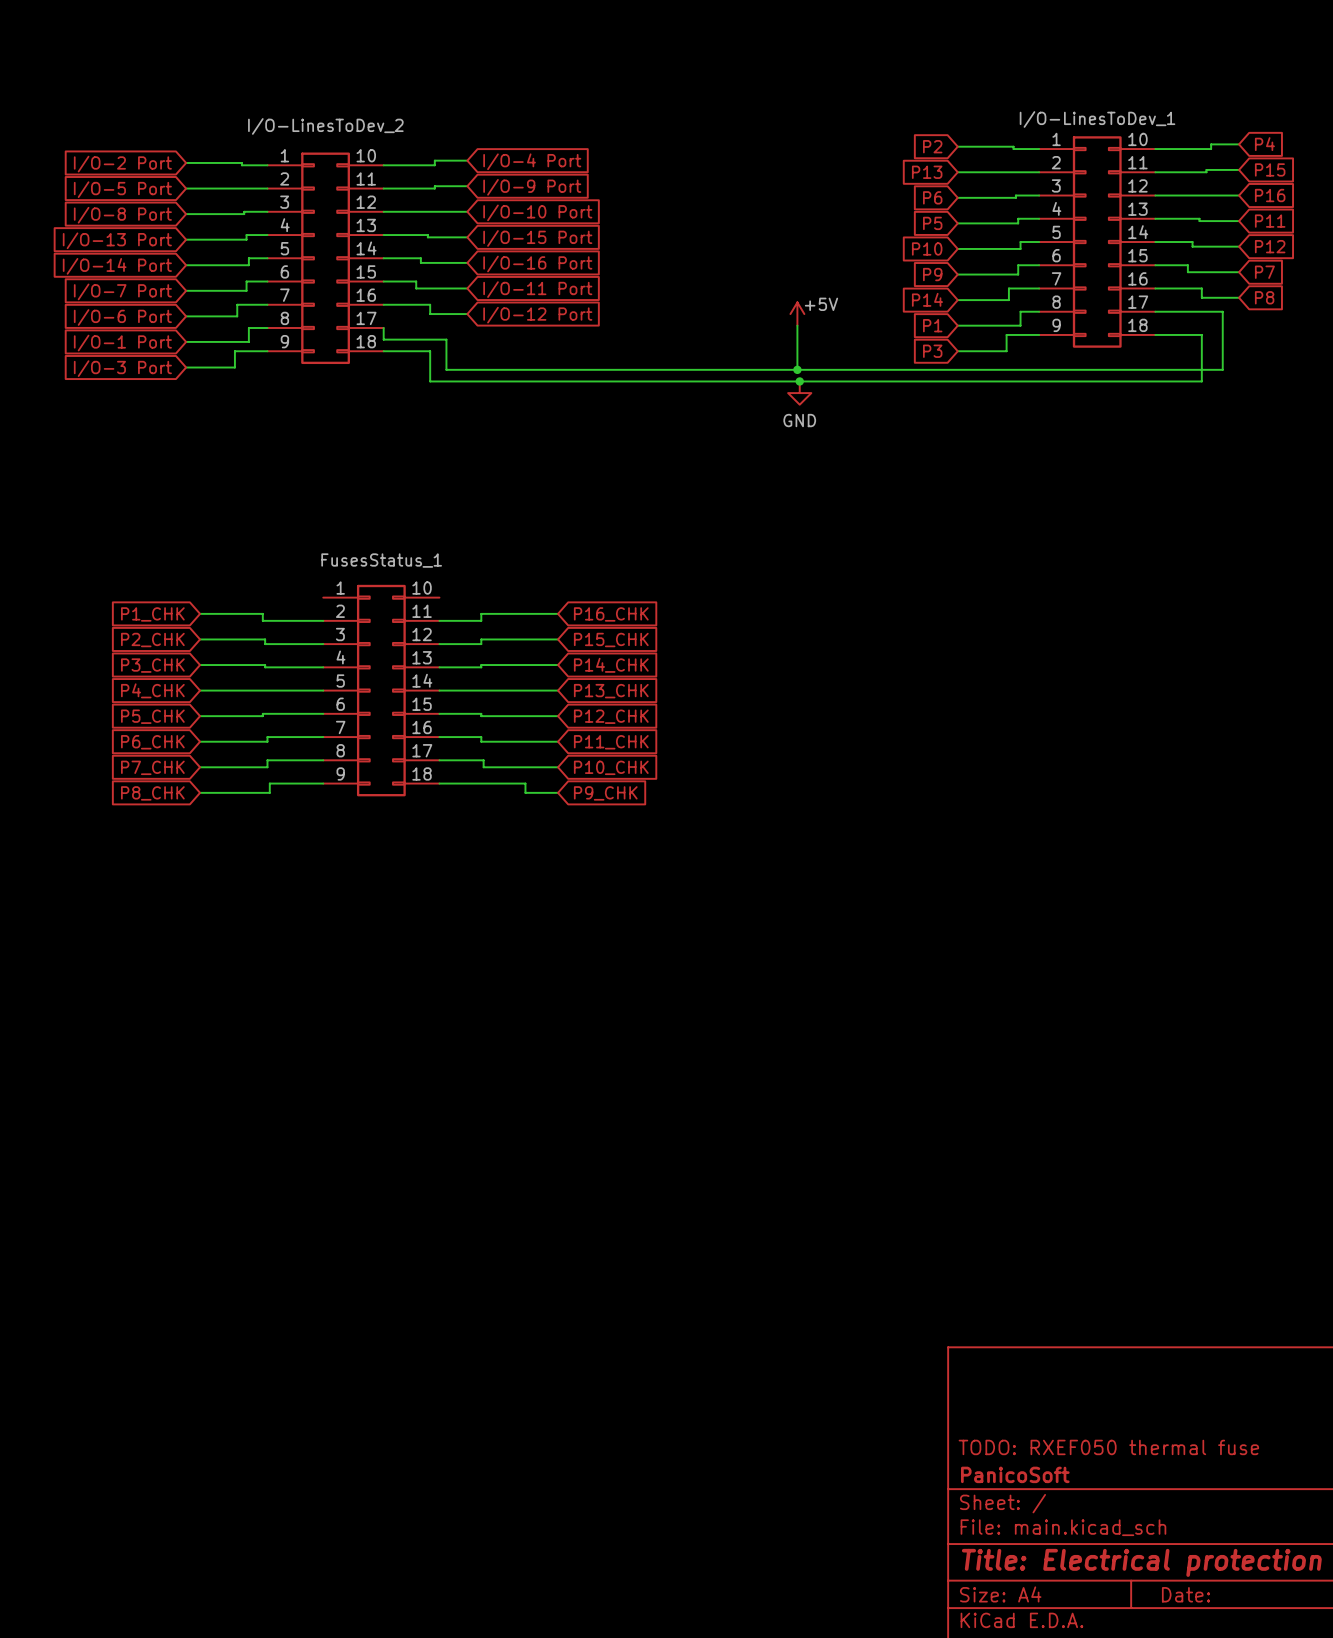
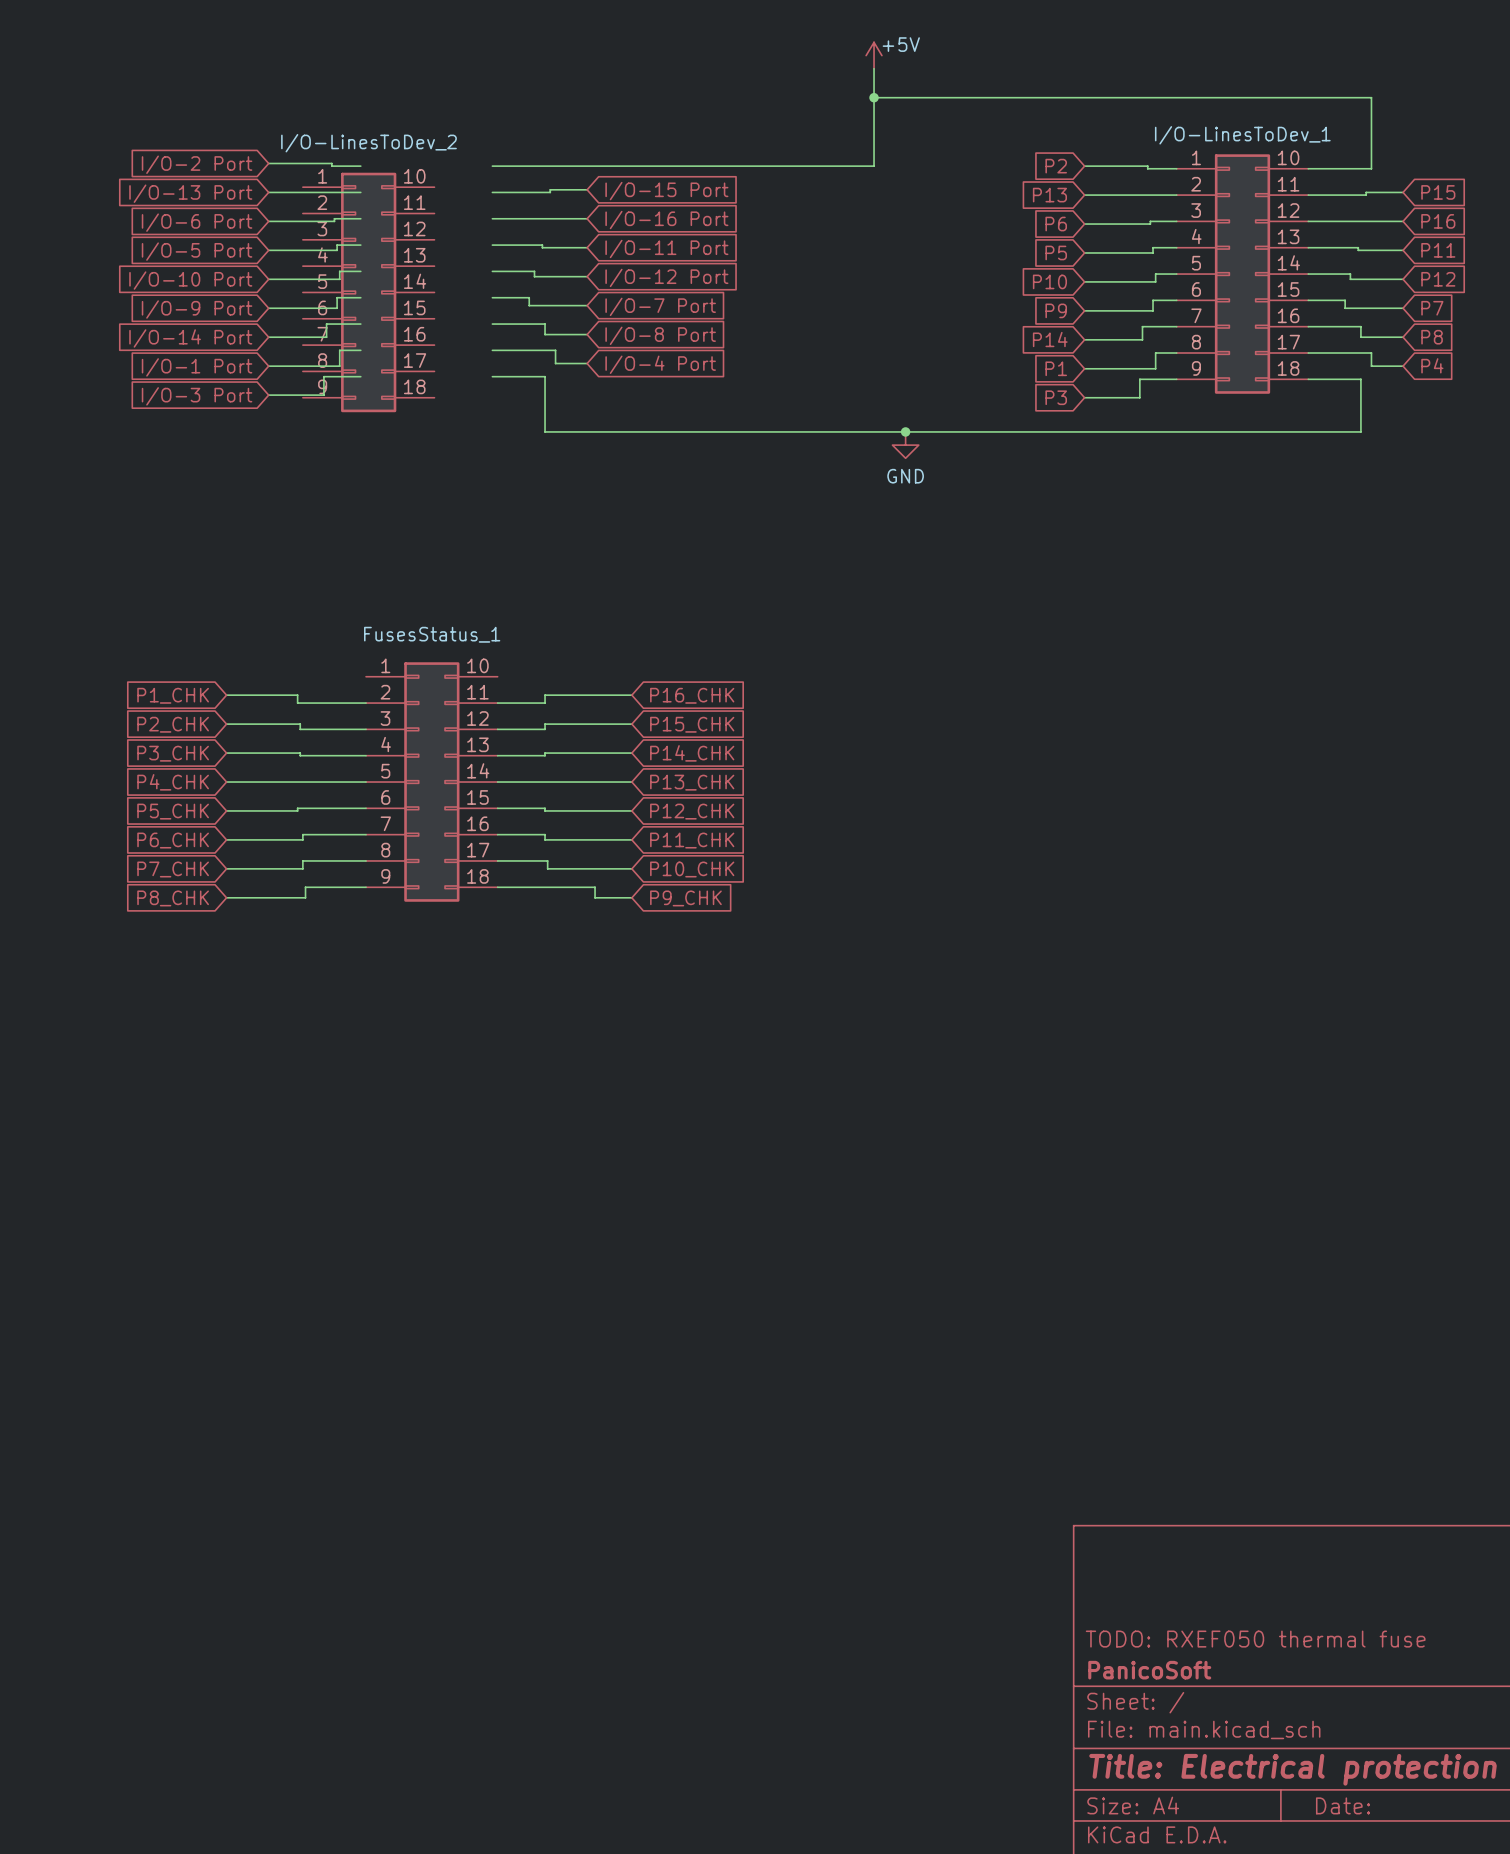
power symbol: none -> +5V (874, 55)
wire: none -> (874, 68) (874, 166) (492, 166)
junction: none -> (874, 97)
wire: (1211, 144) (1239, 144) -> (1371, 163) (1371, 97) (874, 97)
global label position: P4 (1264, 144) -> P4 (1432, 365)
wire: (467, 160) (434, 160) (434, 165) (383, 165) -> none
global label position: I/O-4 Port (532, 161) -> I/O-4 Port (660, 364)
wire: (186, 162) (241, 162) (241, 165) (267, 165) -> (268, 163) (331, 163) (331, 166) (360, 166)
global label position: I/O-2 Port (122, 164) -> I/O-2 Port (197, 164)
wire: (467, 186) (383, 188) -> (587, 189) (550, 189) (550, 192) (492, 192)
global label: I/O-9 Port (532, 187) -> none
wire: (186, 188) (267, 188) -> (268, 192) (360, 192)
global label position: I/O-5 Port (122, 189) -> I/O-5 Port (197, 251)
wire: (267, 211) (244, 211) (244, 214) (186, 214) -> (360, 218) (334, 218) (334, 221) (268, 221)
wire: (383, 211) (467, 211) -> (492, 218) (587, 218)
global label: I/O-10 Port (537, 212) -> none
global label: I/O-8 Port (122, 215) -> none
wire: (267, 235) (246, 235) (246, 239) (186, 239) -> (360, 245) (337, 245) (337, 250) (268, 250)
wire: (383, 235) (467, 237) -> (492, 245) (587, 247)
global label position: I/O-15 Port (537, 238) -> I/O-15 Port (666, 191)
wire: none -> (492, 271) (534, 271) (534, 276) (587, 276)
global label position: I/O-13 Port (117, 240) -> I/O-13 Port (190, 193)
global label: none -> I/O-10 Port (190, 280)
wire: (267, 258) (248, 258) (248, 265) (186, 265) -> (360, 271) (339, 271) (339, 279) (268, 279)
wire: (383, 258) (420, 258) (420, 262) (434, 262) -> none
wire: none -> (529, 297) (529, 305) (587, 305)
global label position: I/O-16 Port (537, 264) -> I/O-16 Port (666, 220)
global label position: I/O-14 Port (117, 266) -> I/O-14 Port (190, 338)
global label: none -> I/O-7 Port (660, 306)
wire: (267, 281) (246, 281) (246, 290) (186, 290) -> (360, 297) (337, 297) (337, 308) (268, 308)
wire: (383, 281) (416, 281) (416, 288) (467, 288) -> none
global label position: I/O-11 Port (537, 289) -> I/O-11 Port (666, 248)
global label: I/O-7 Port (122, 291) -> I/O-9 Port (197, 309)
global label: none -> I/O-8 Port (660, 335)
wire: (267, 304) (237, 304) (237, 316) (186, 316) -> (360, 324) (326, 324) (326, 337) (268, 337)
wire: (383, 304) (430, 304) (430, 314) (467, 314) -> (492, 324) (545, 324) (545, 334) (587, 334)
wire: none -> (492, 350) (555, 350) (555, 363) (587, 363)
wire: (1211, 311) (1222, 311) (1222, 369) (446, 369) (446, 339) (383, 339) (383, 328) -> (1371, 353) (1371, 366) (1403, 366)
power symbol: +5V (797, 314) -> none
global label position: I/O-12 Port (537, 315) -> I/O-12 Port (666, 277)
global label position: I/O-6 Port (122, 317) -> I/O-6 Port (197, 222)
wire: (797, 325) (797, 369) -> none
wire: (267, 328) (248, 328) (248, 341) (186, 341) -> (360, 350) (339, 350) (339, 366) (268, 366)
global label position: I/O-1 Port (122, 343) -> I/O-1 Port (197, 367)
wire: (267, 351) (234, 351) (234, 367) (186, 367) -> (360, 376) (323, 376) (323, 395) (268, 395)
wire: (383, 351) (430, 351) (430, 381) (481, 381) -> (492, 376) (545, 376) (545, 431)
global label position: I/O-3 Port (122, 368) -> I/O-3 Port (197, 396)
junction: (797, 369) -> none

